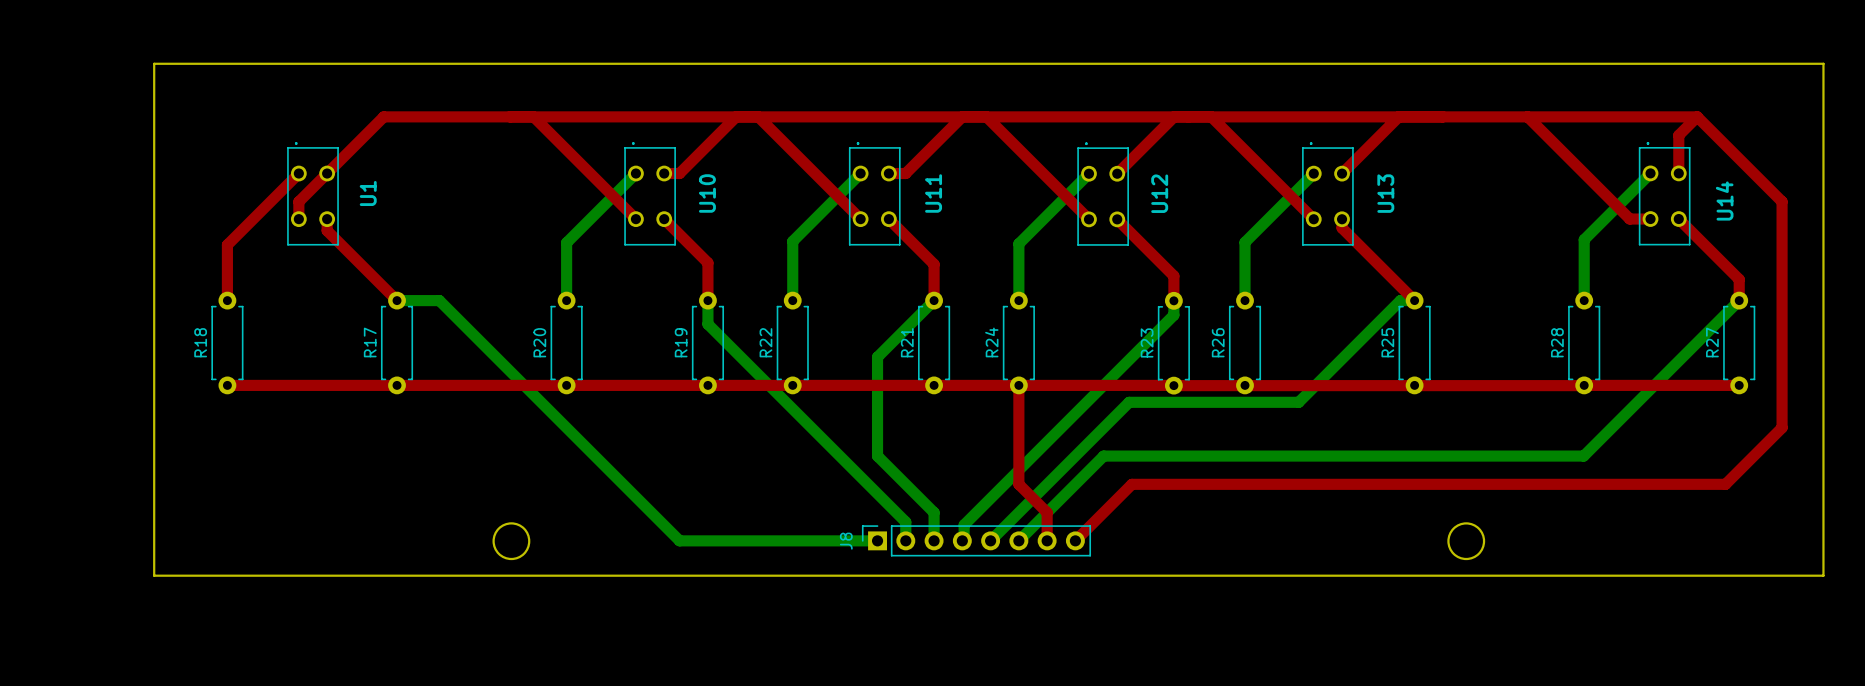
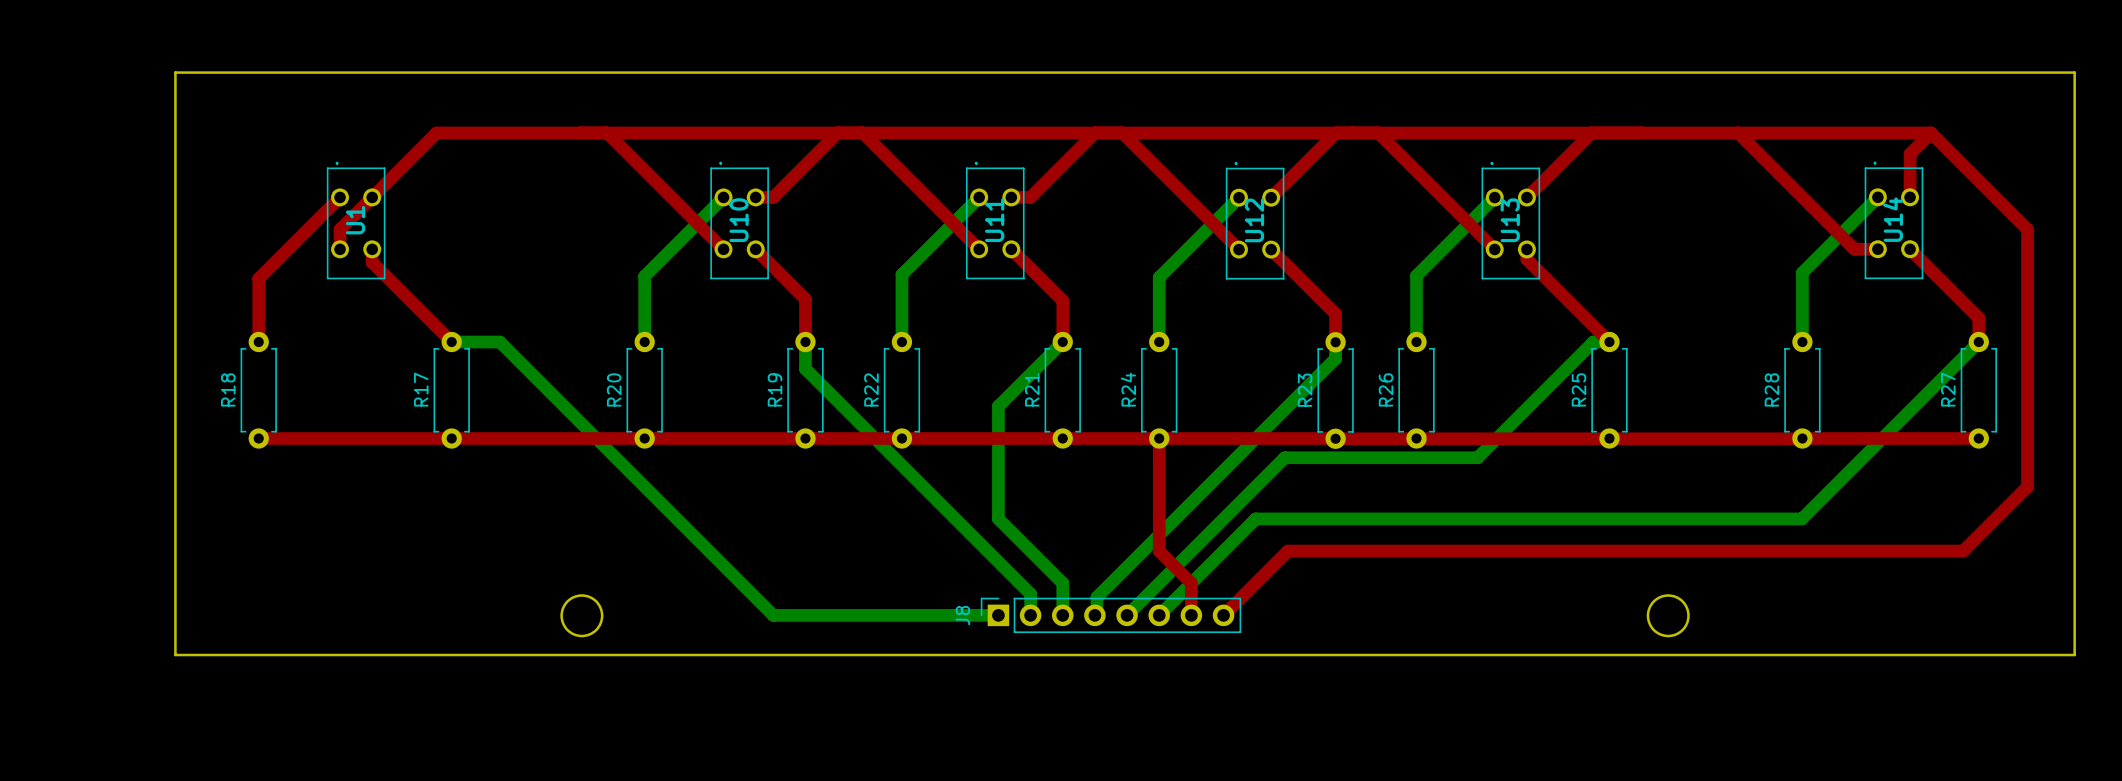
U1 name position: U1 (368, 193) -> U1 (355, 220)
U10 name position: U10 (707, 193) -> U10 (739, 220)
U11 name position: U11 (933, 193) -> U11 (994, 220)
U12 name position: U12 (1159, 193) -> U12 (1254, 220)
U13 name position: U13 (1385, 193) -> U13 (1510, 220)
U14 name position: U14 (1724, 201) -> U14 (1892, 219)

